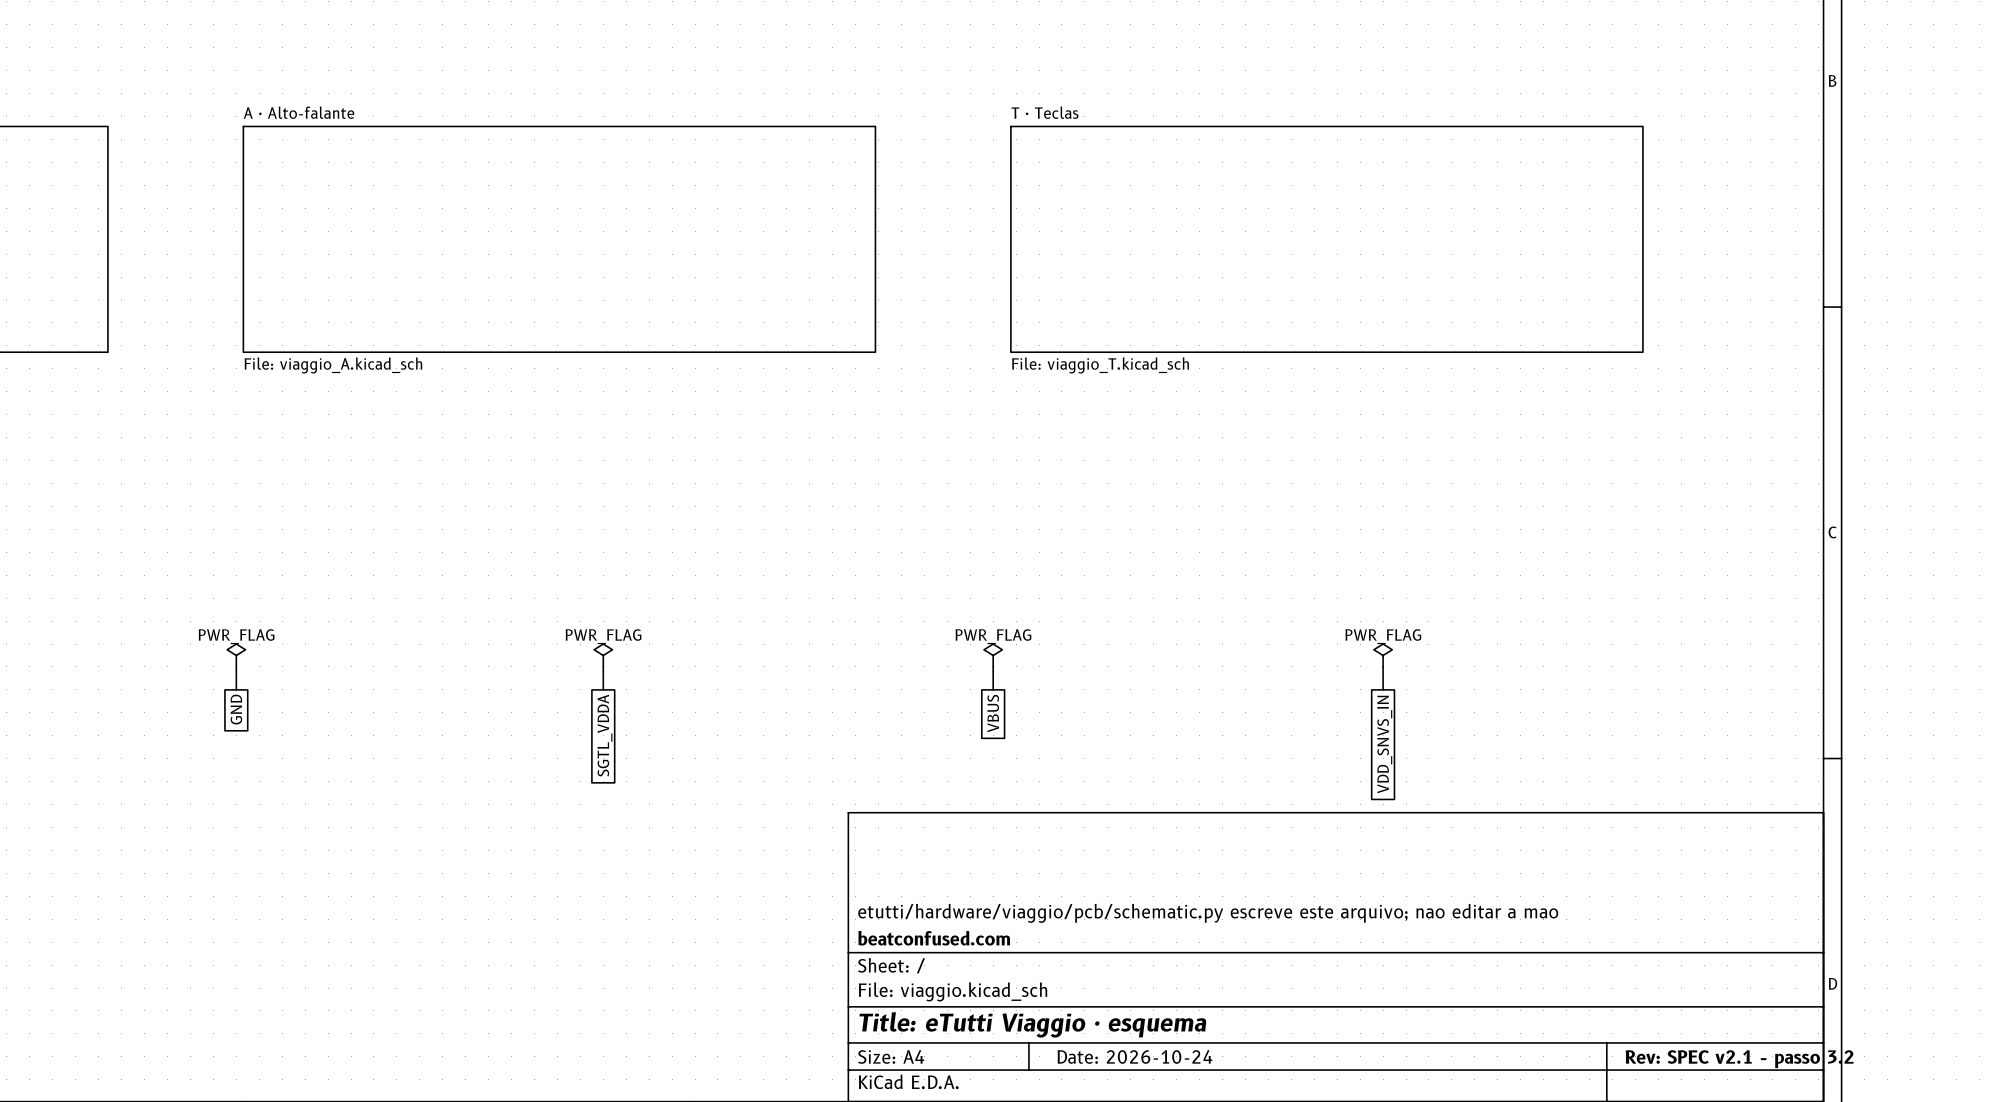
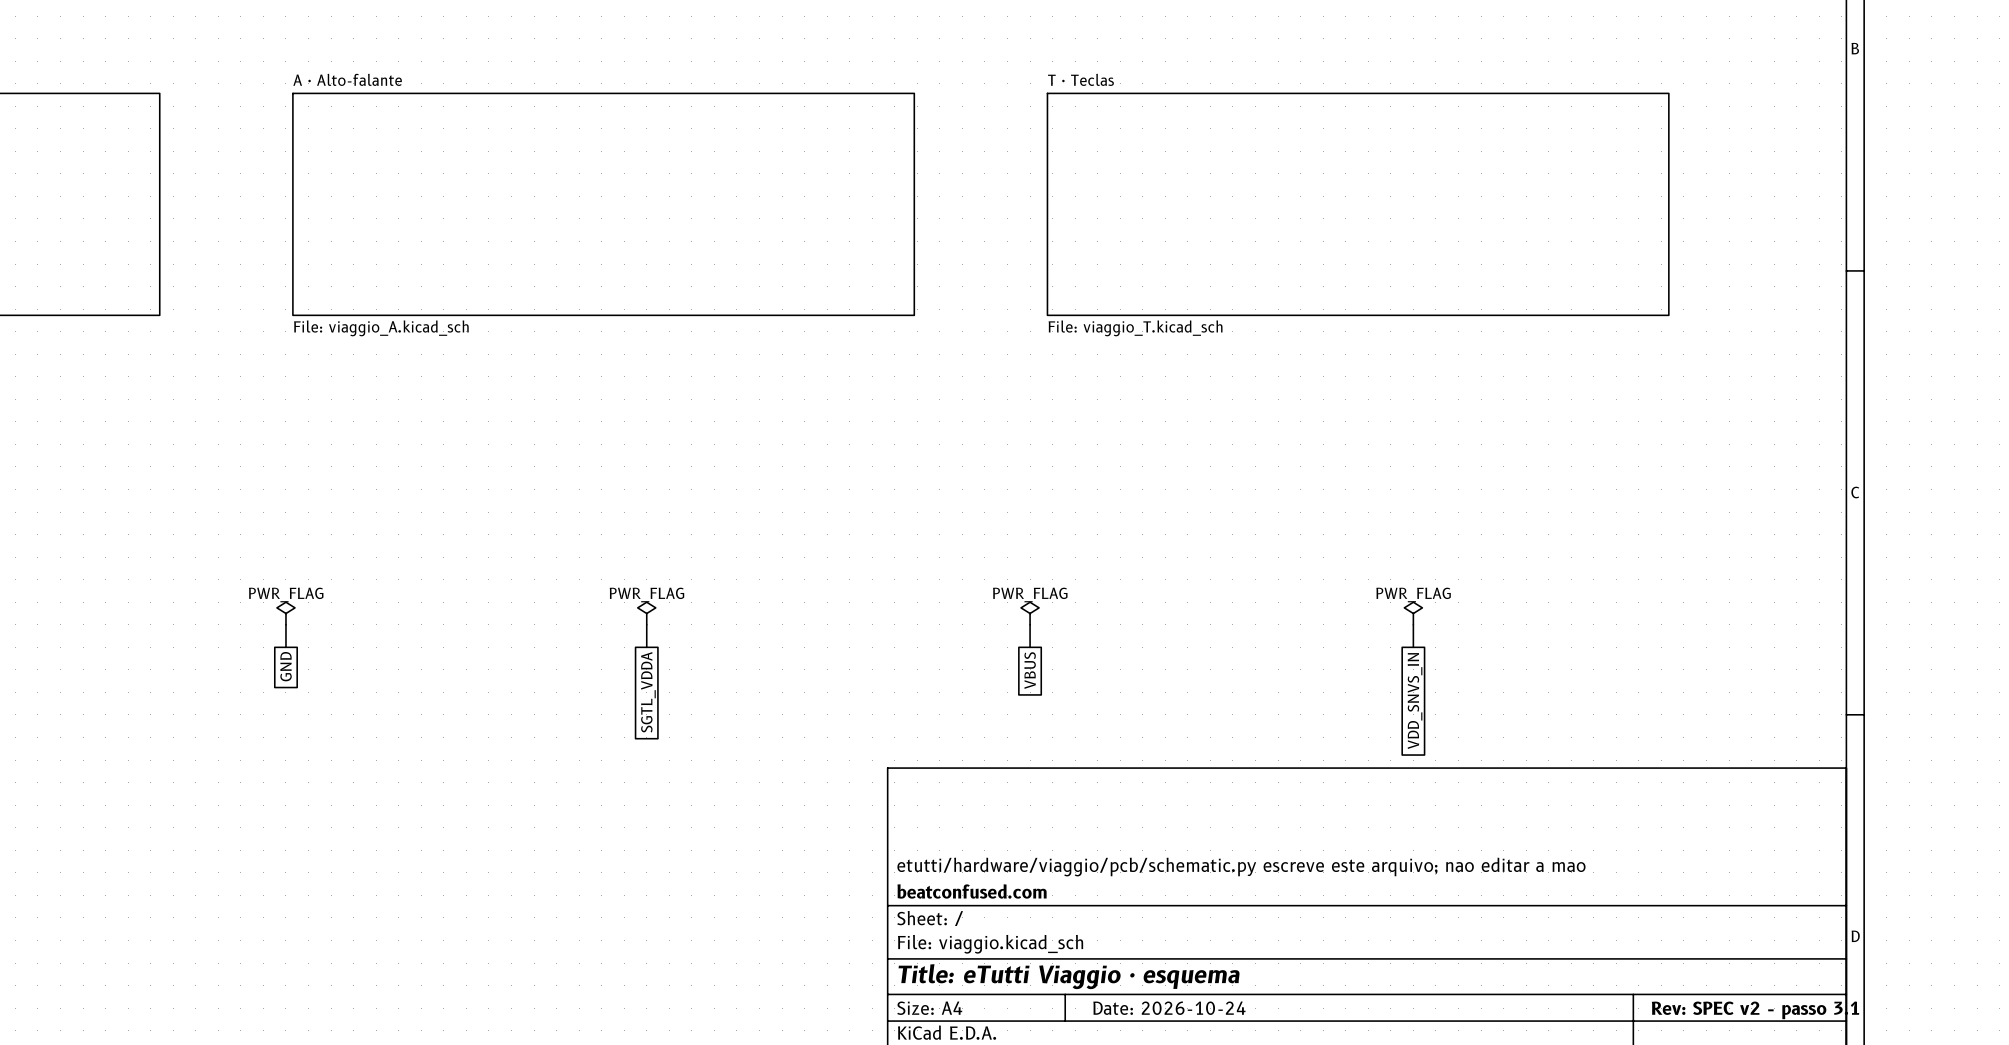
title block: Rev: SPEC v2.1 - passo 3.2 (1739, 1059) -> Rev: SPEC v2 - passo 3.1 (1755, 1010)

